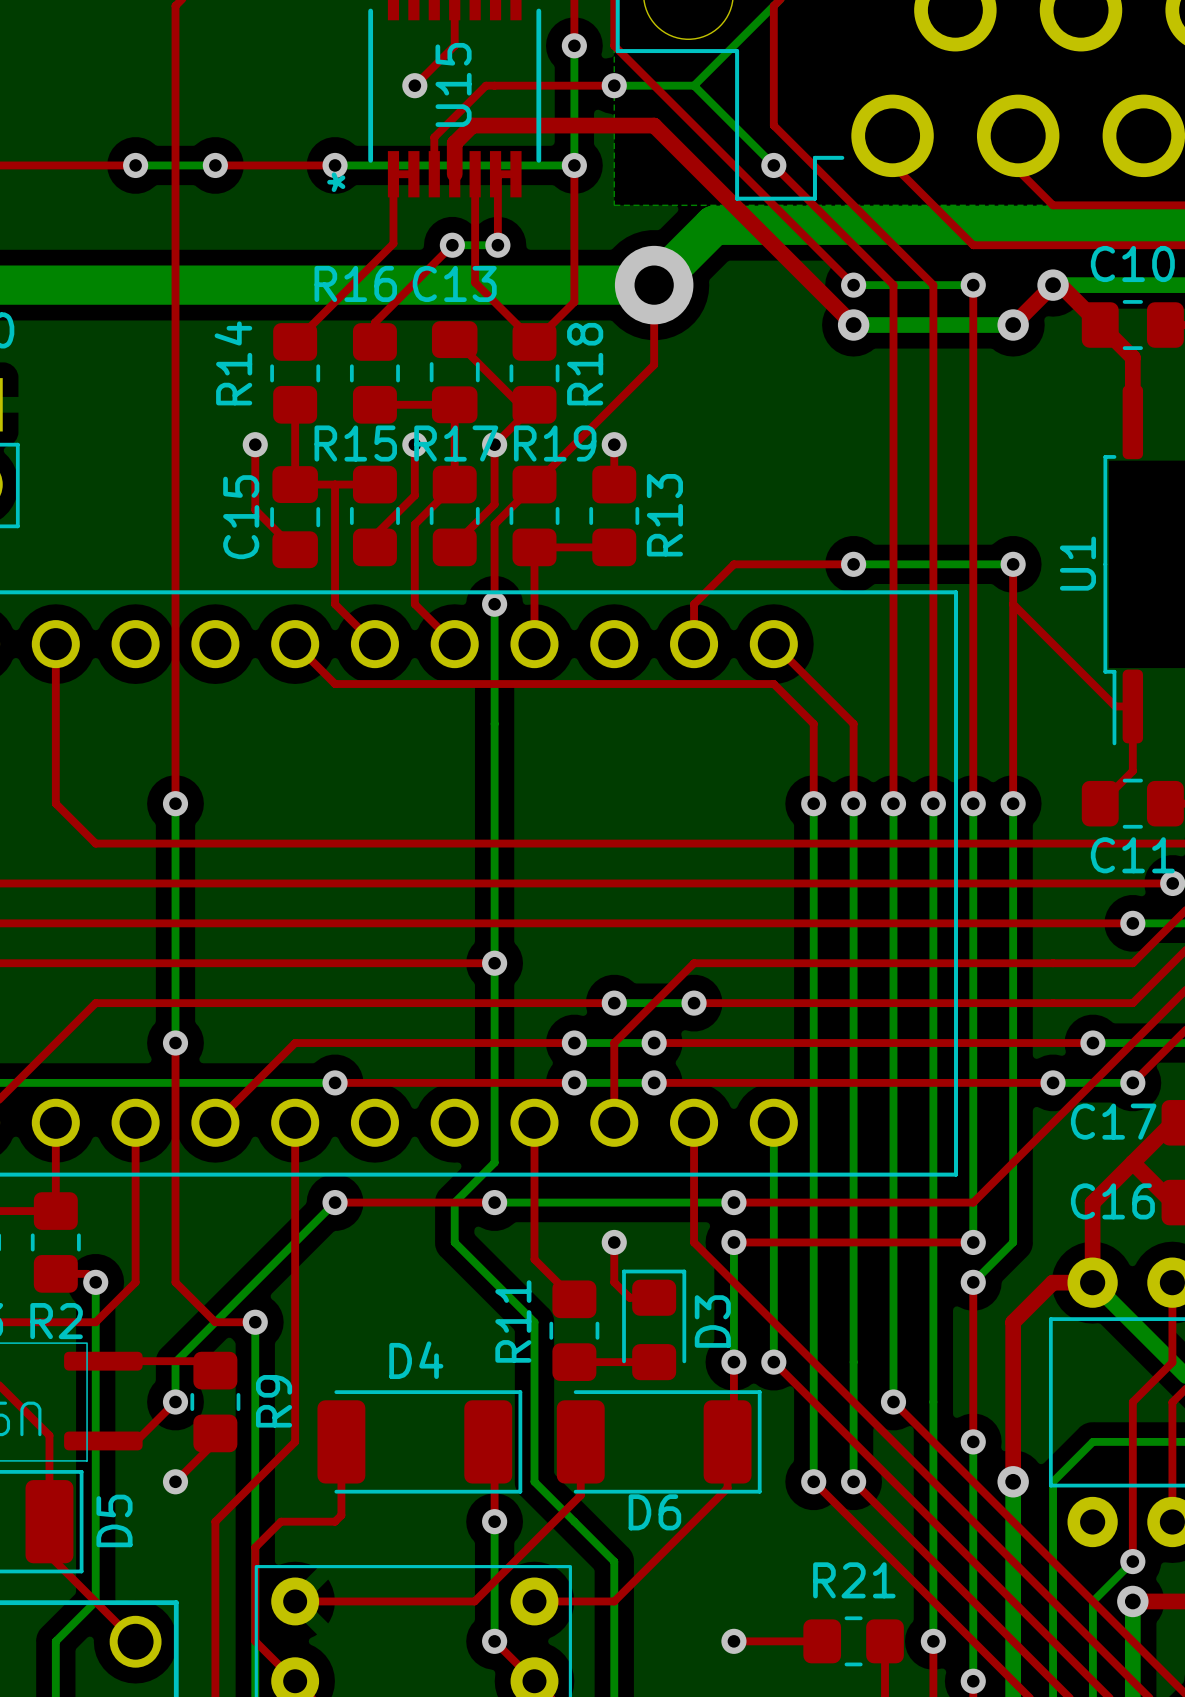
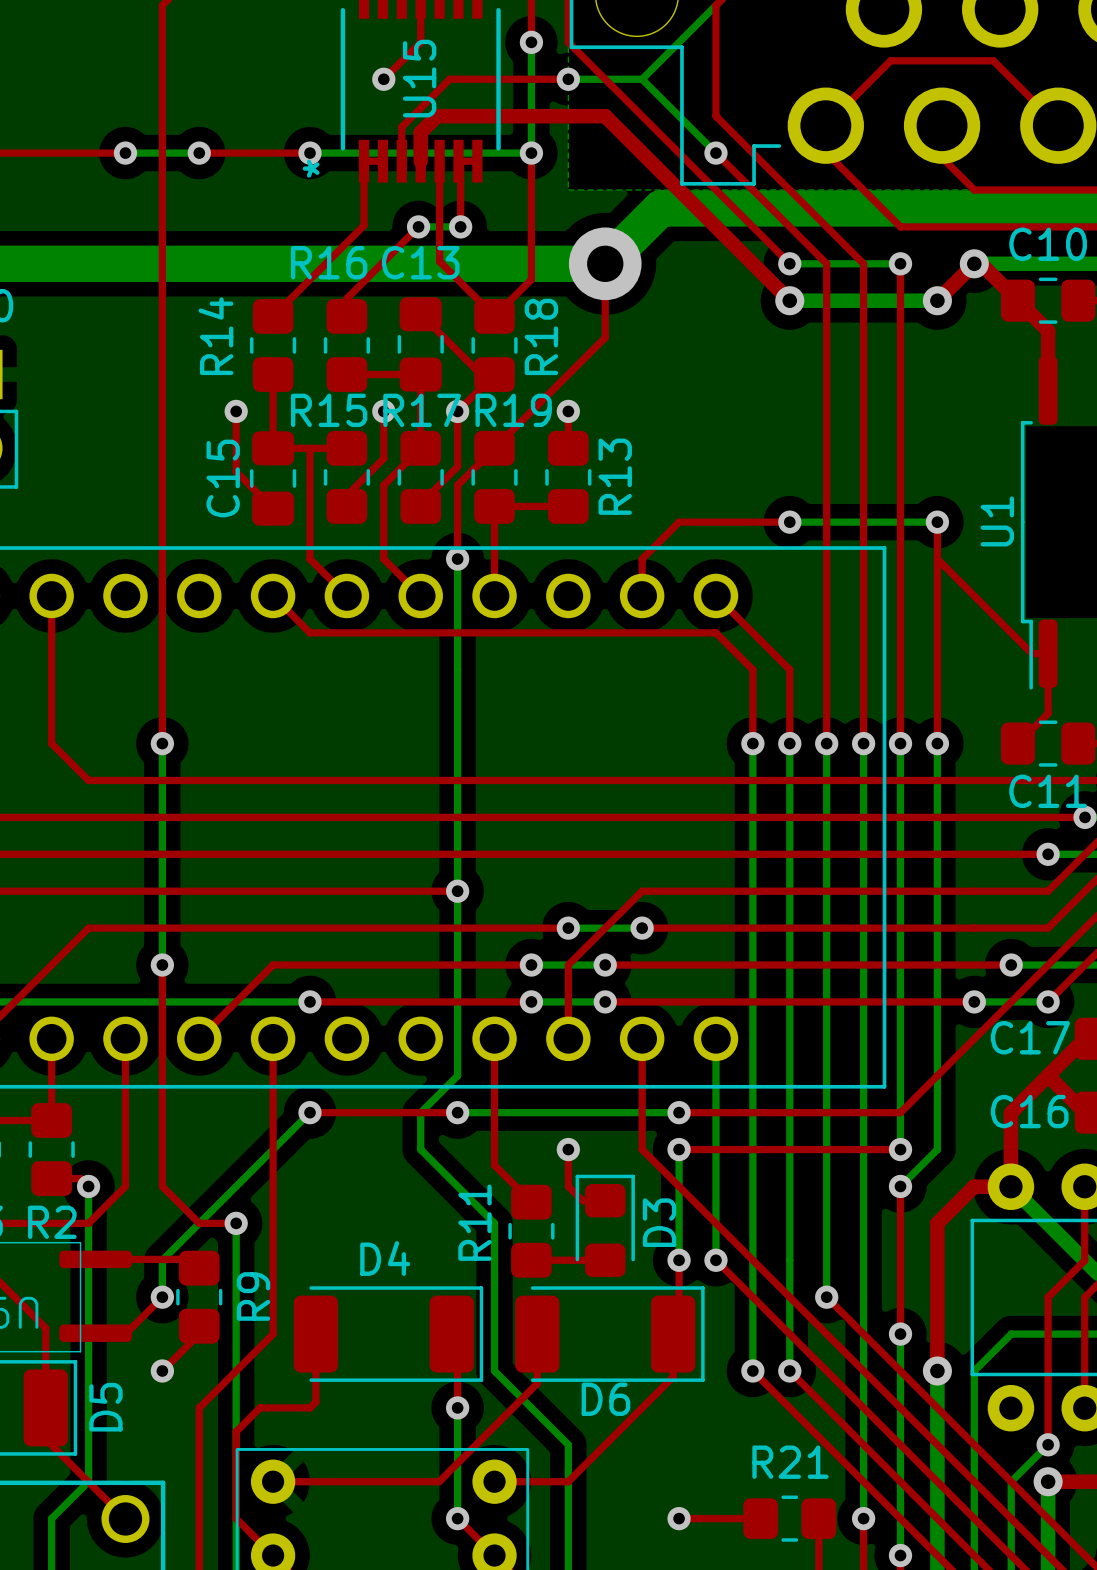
top track: none -> (825, 125) (890, 60) (993, 60) (1058, 125)

